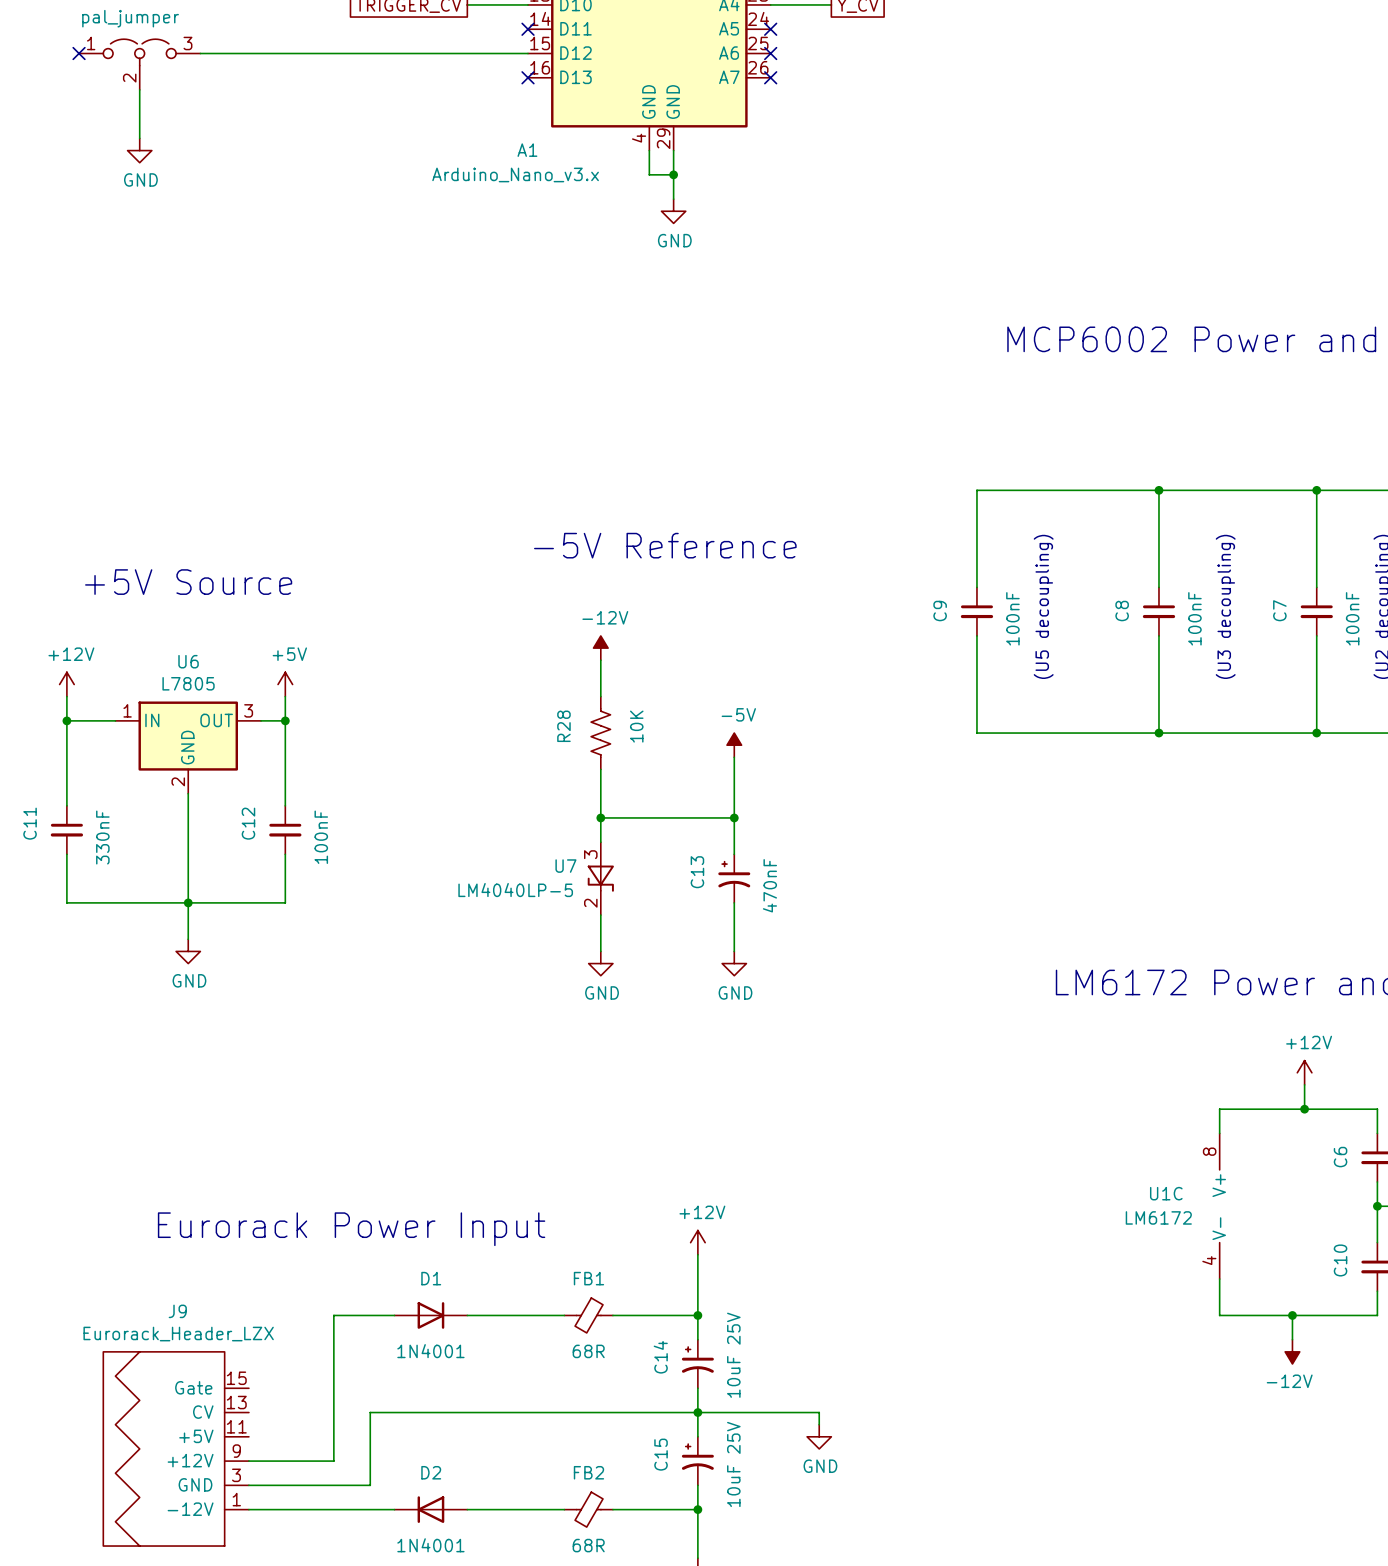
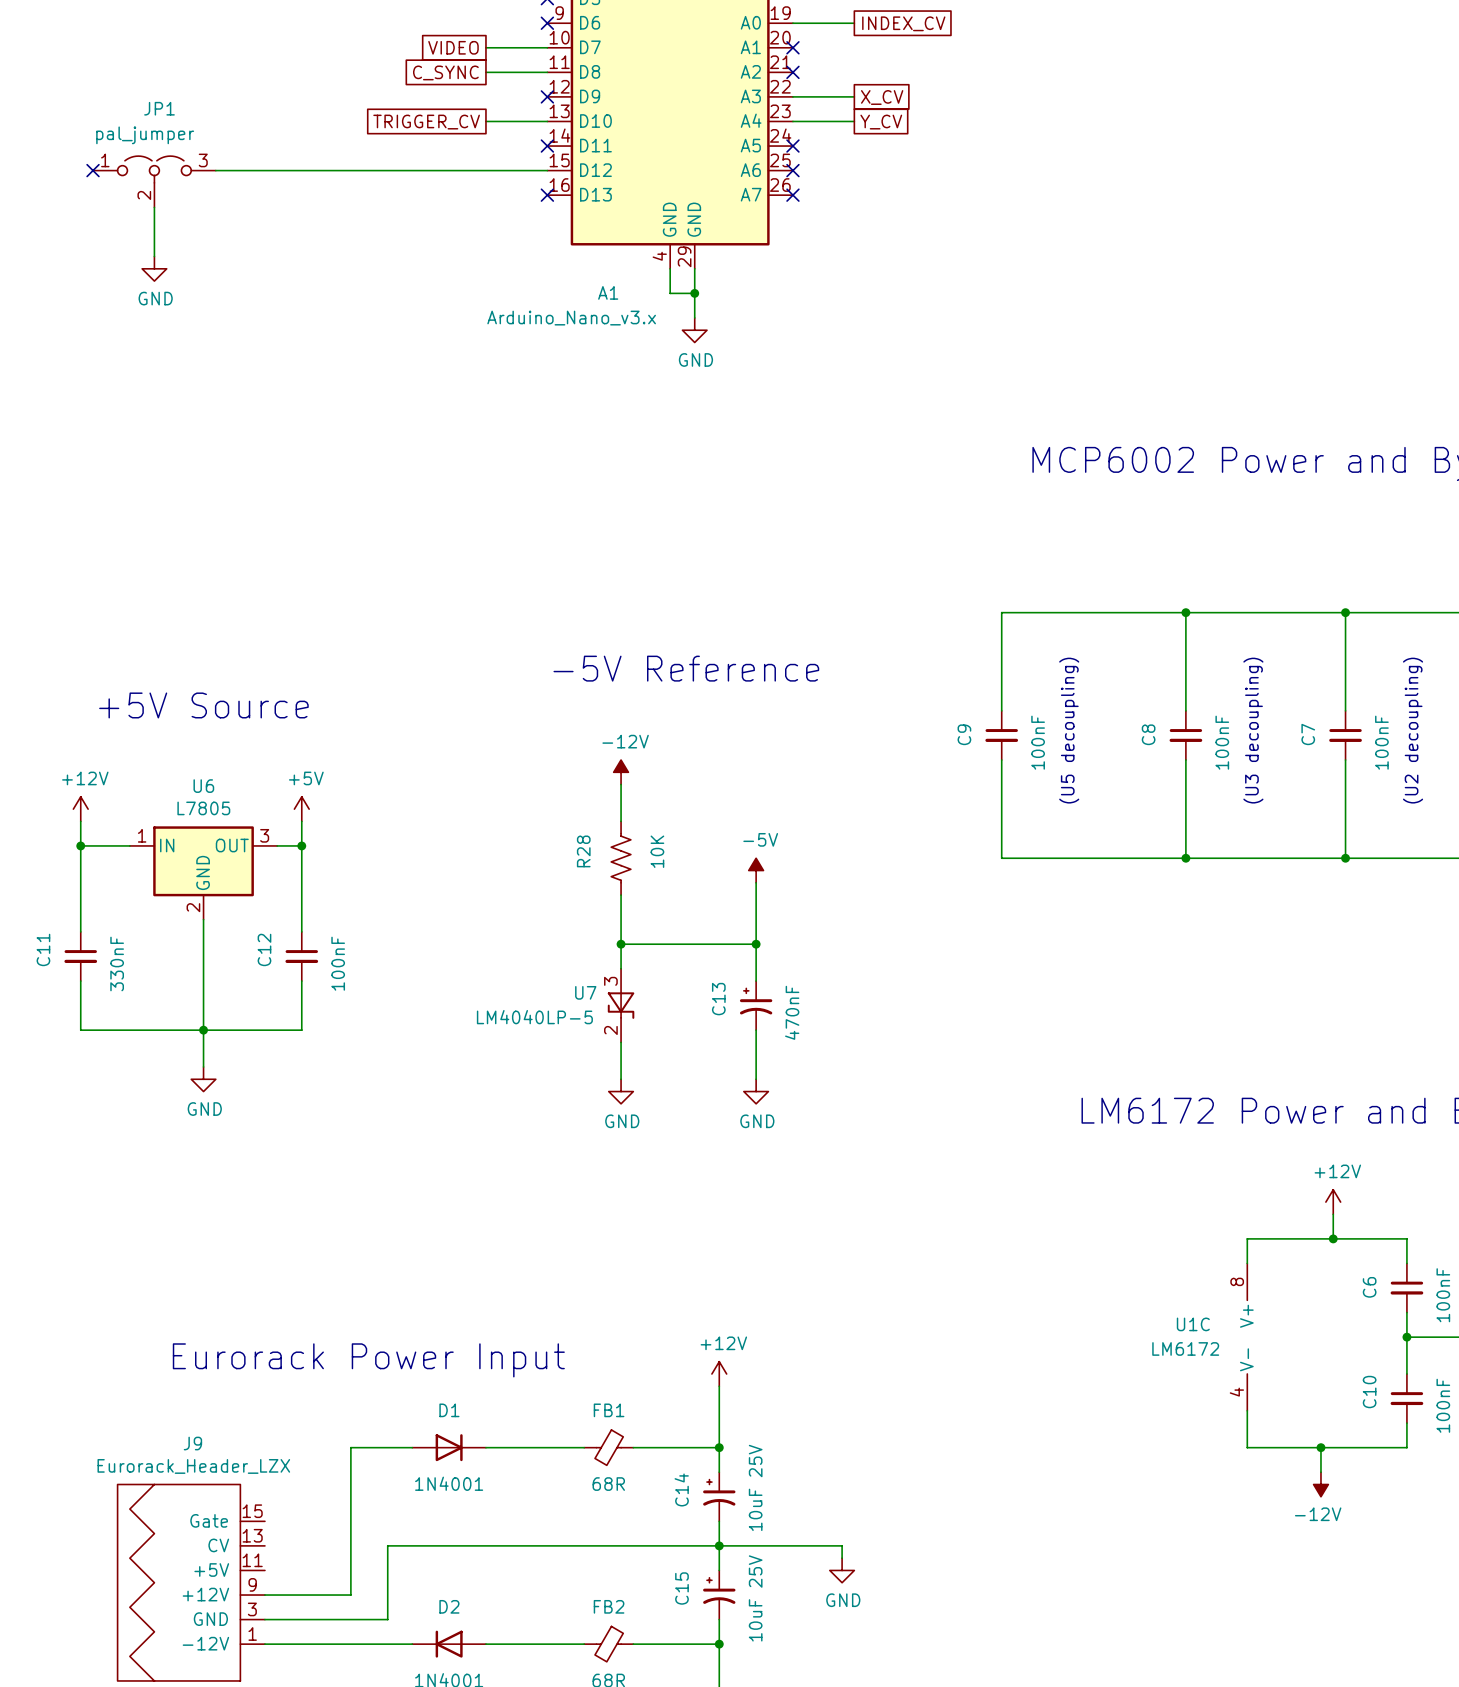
A1 name position: A1 (527, 150) -> A1 (608, 292)
A1 value position: Arduino_Nano_v3.x (515, 174) -> Arduino_Nano_v3.x (571, 318)

